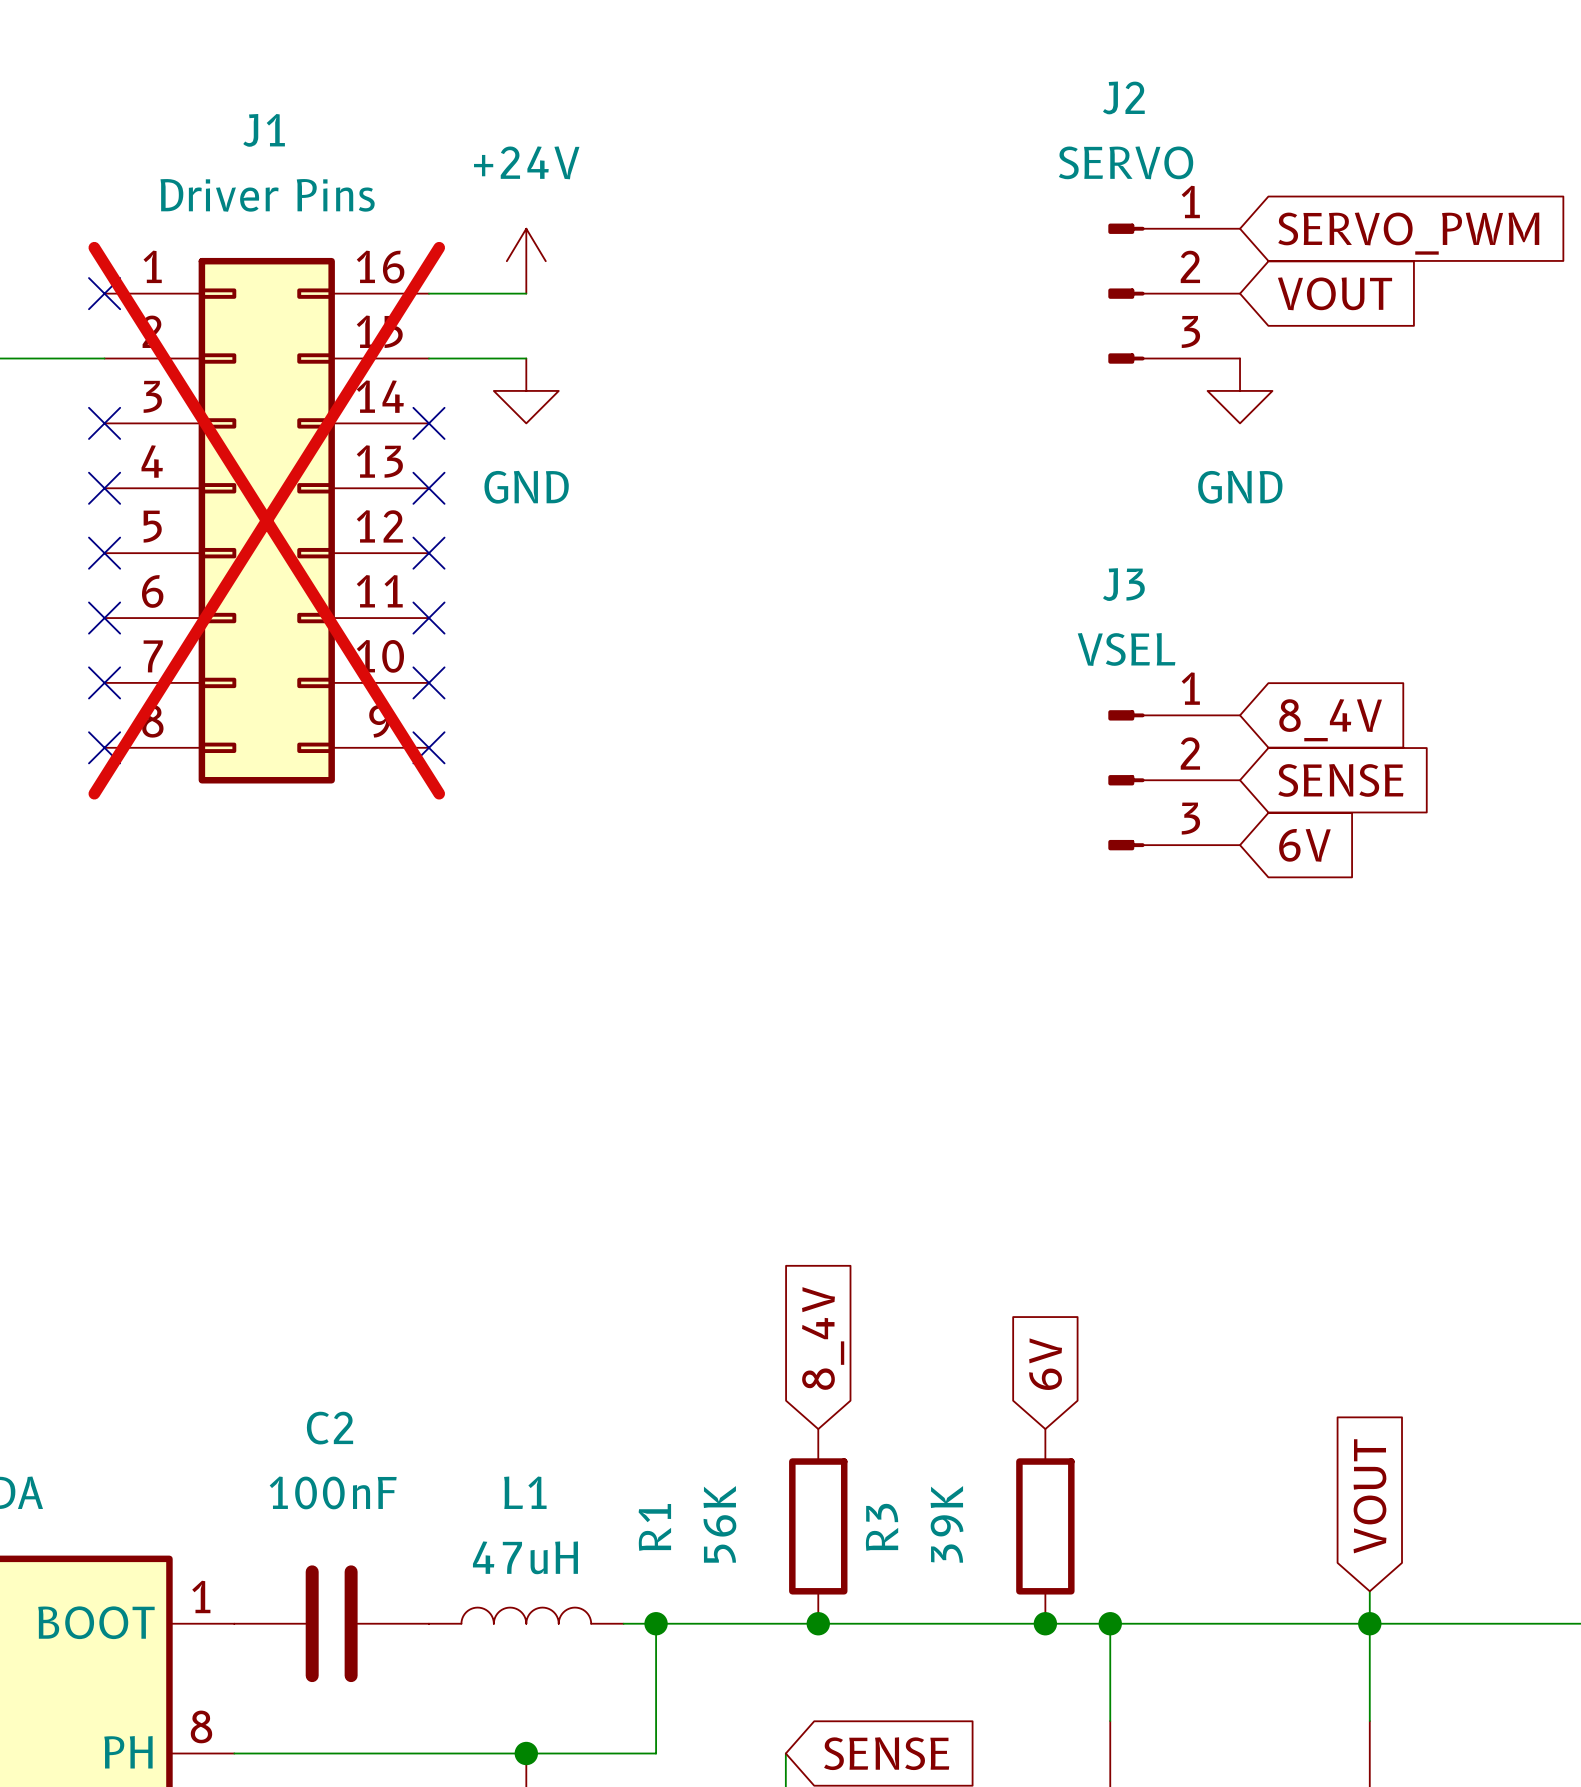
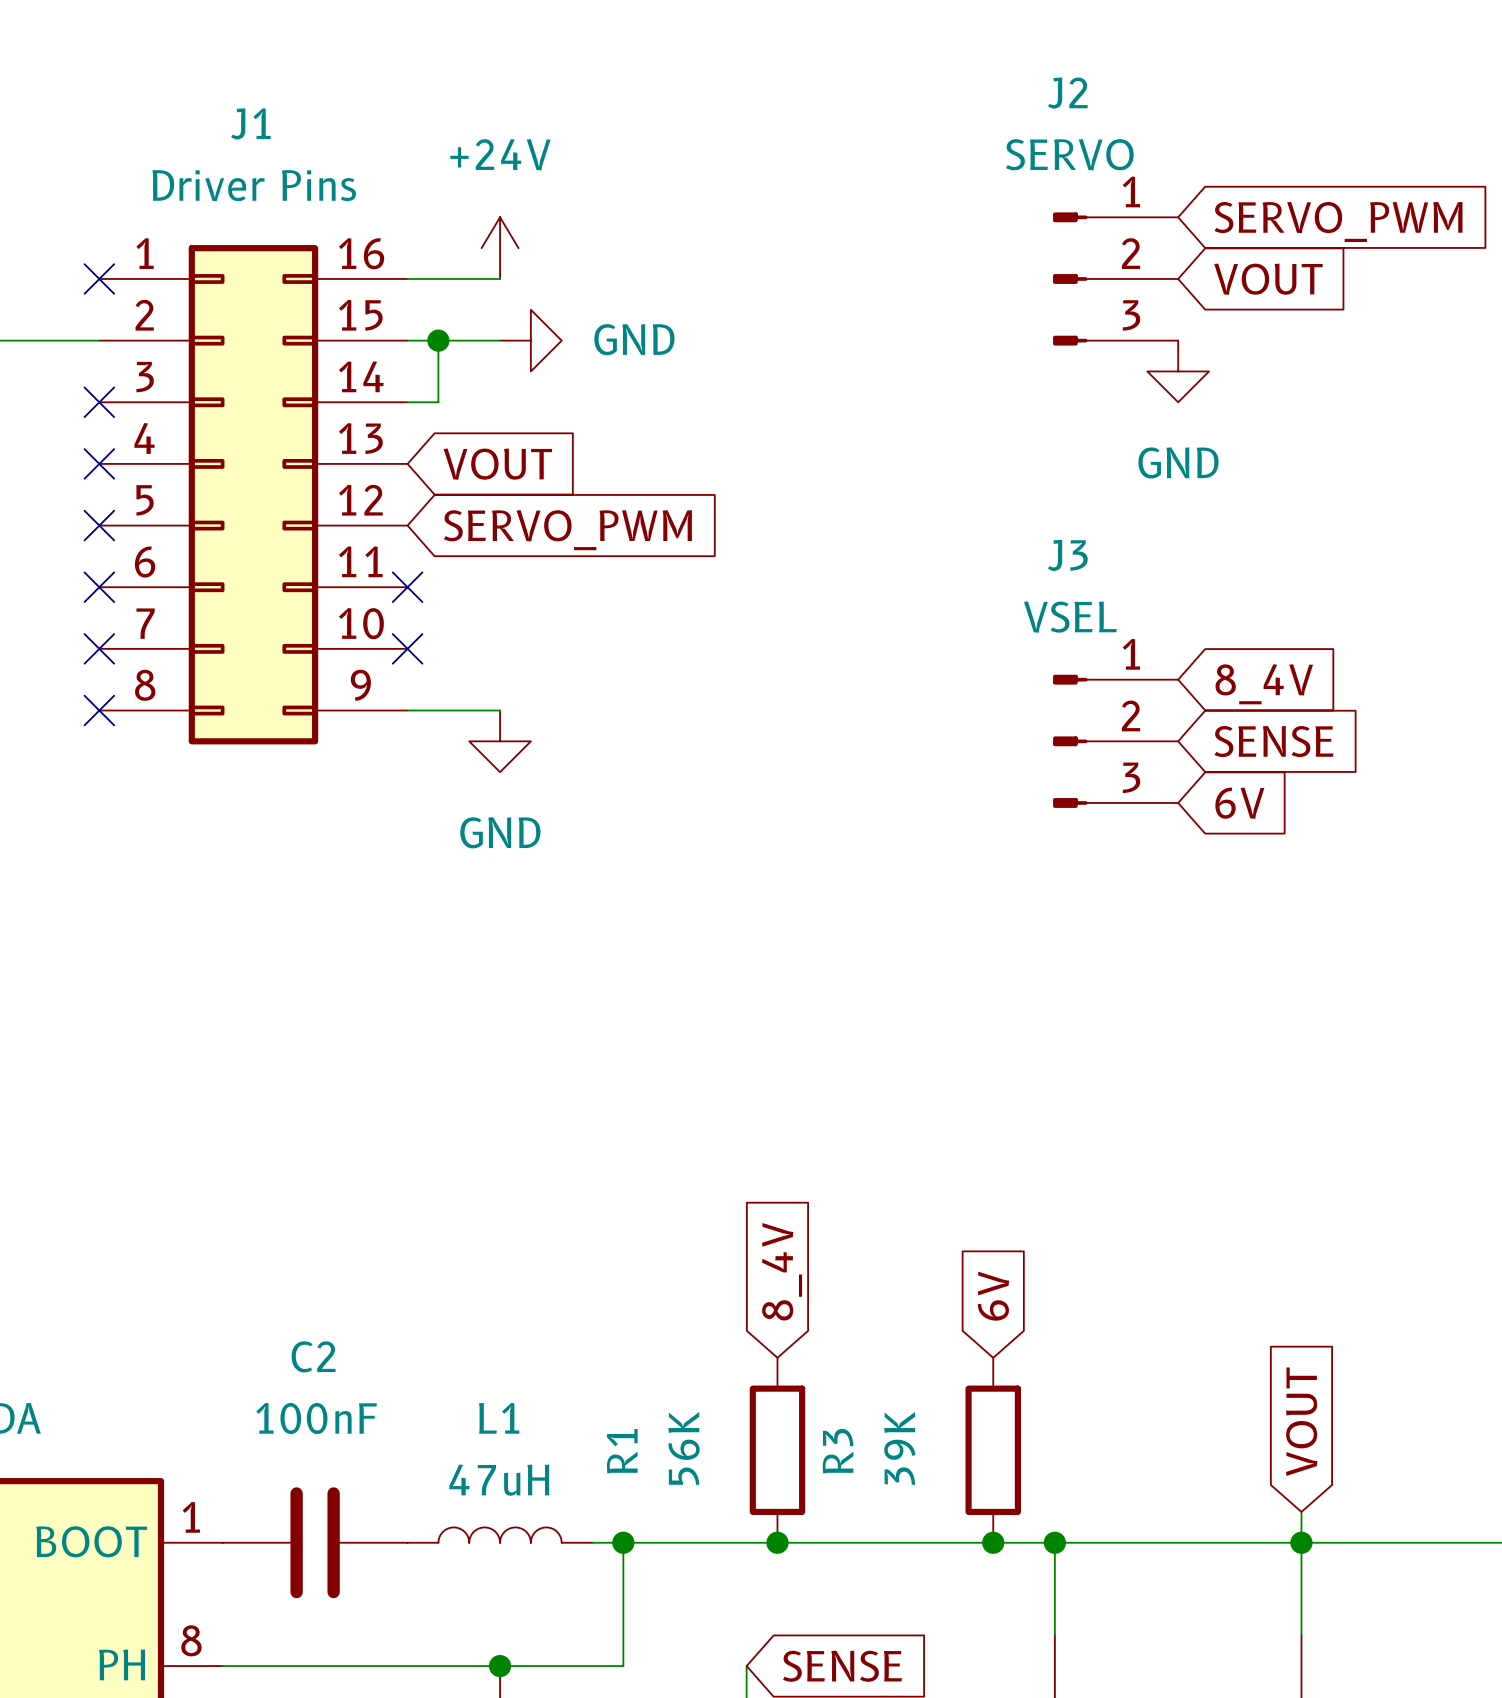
wire: none -> (438, 340) (438, 402) (407, 402)
junction: none -> (438, 340)
power symbol rotation: 0° (526, 390) -> 90° counterclockwise (530, 340)
power symbol position: GND (526, 390) -> GND (530, 340)
no-connect mark: (428, 423) -> none
no-connect mark: (428, 488) -> none
global label: none -> VOUT (497, 464)
J1 do-not-place cross: (266, 520) -> none
no-connect mark: (428, 553) -> none
global label: none -> SERVO_PWM (567, 530)
wire: none -> (407, 710) (500, 710)
no-connect mark: (428, 747) -> none
power symbol: none -> GND (500, 741)

